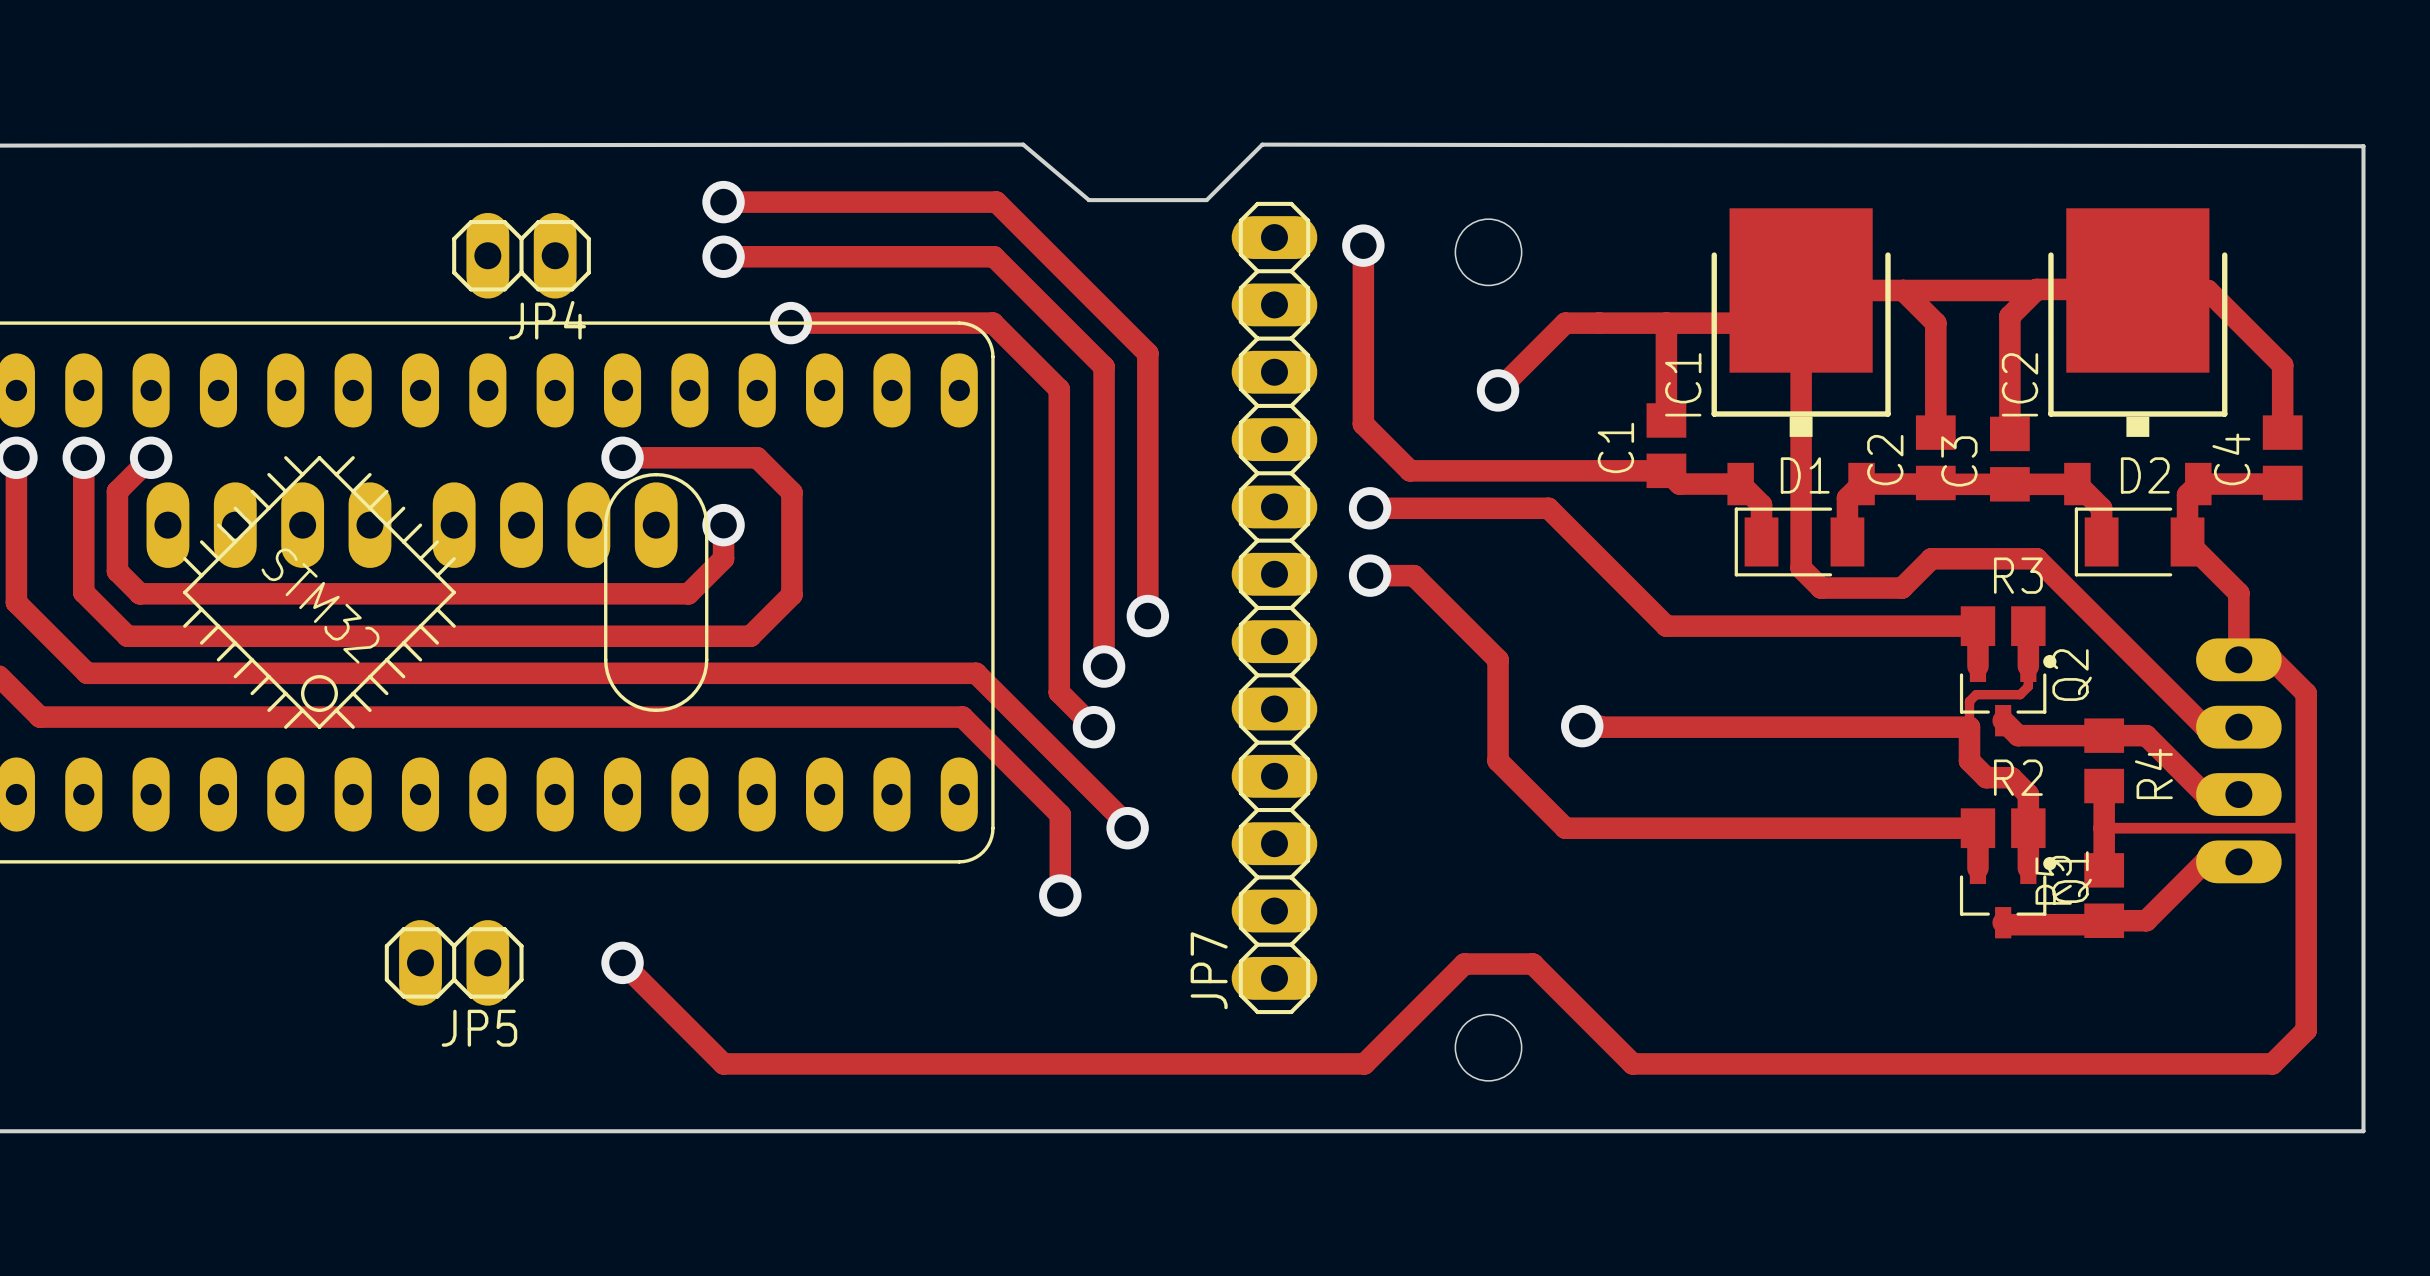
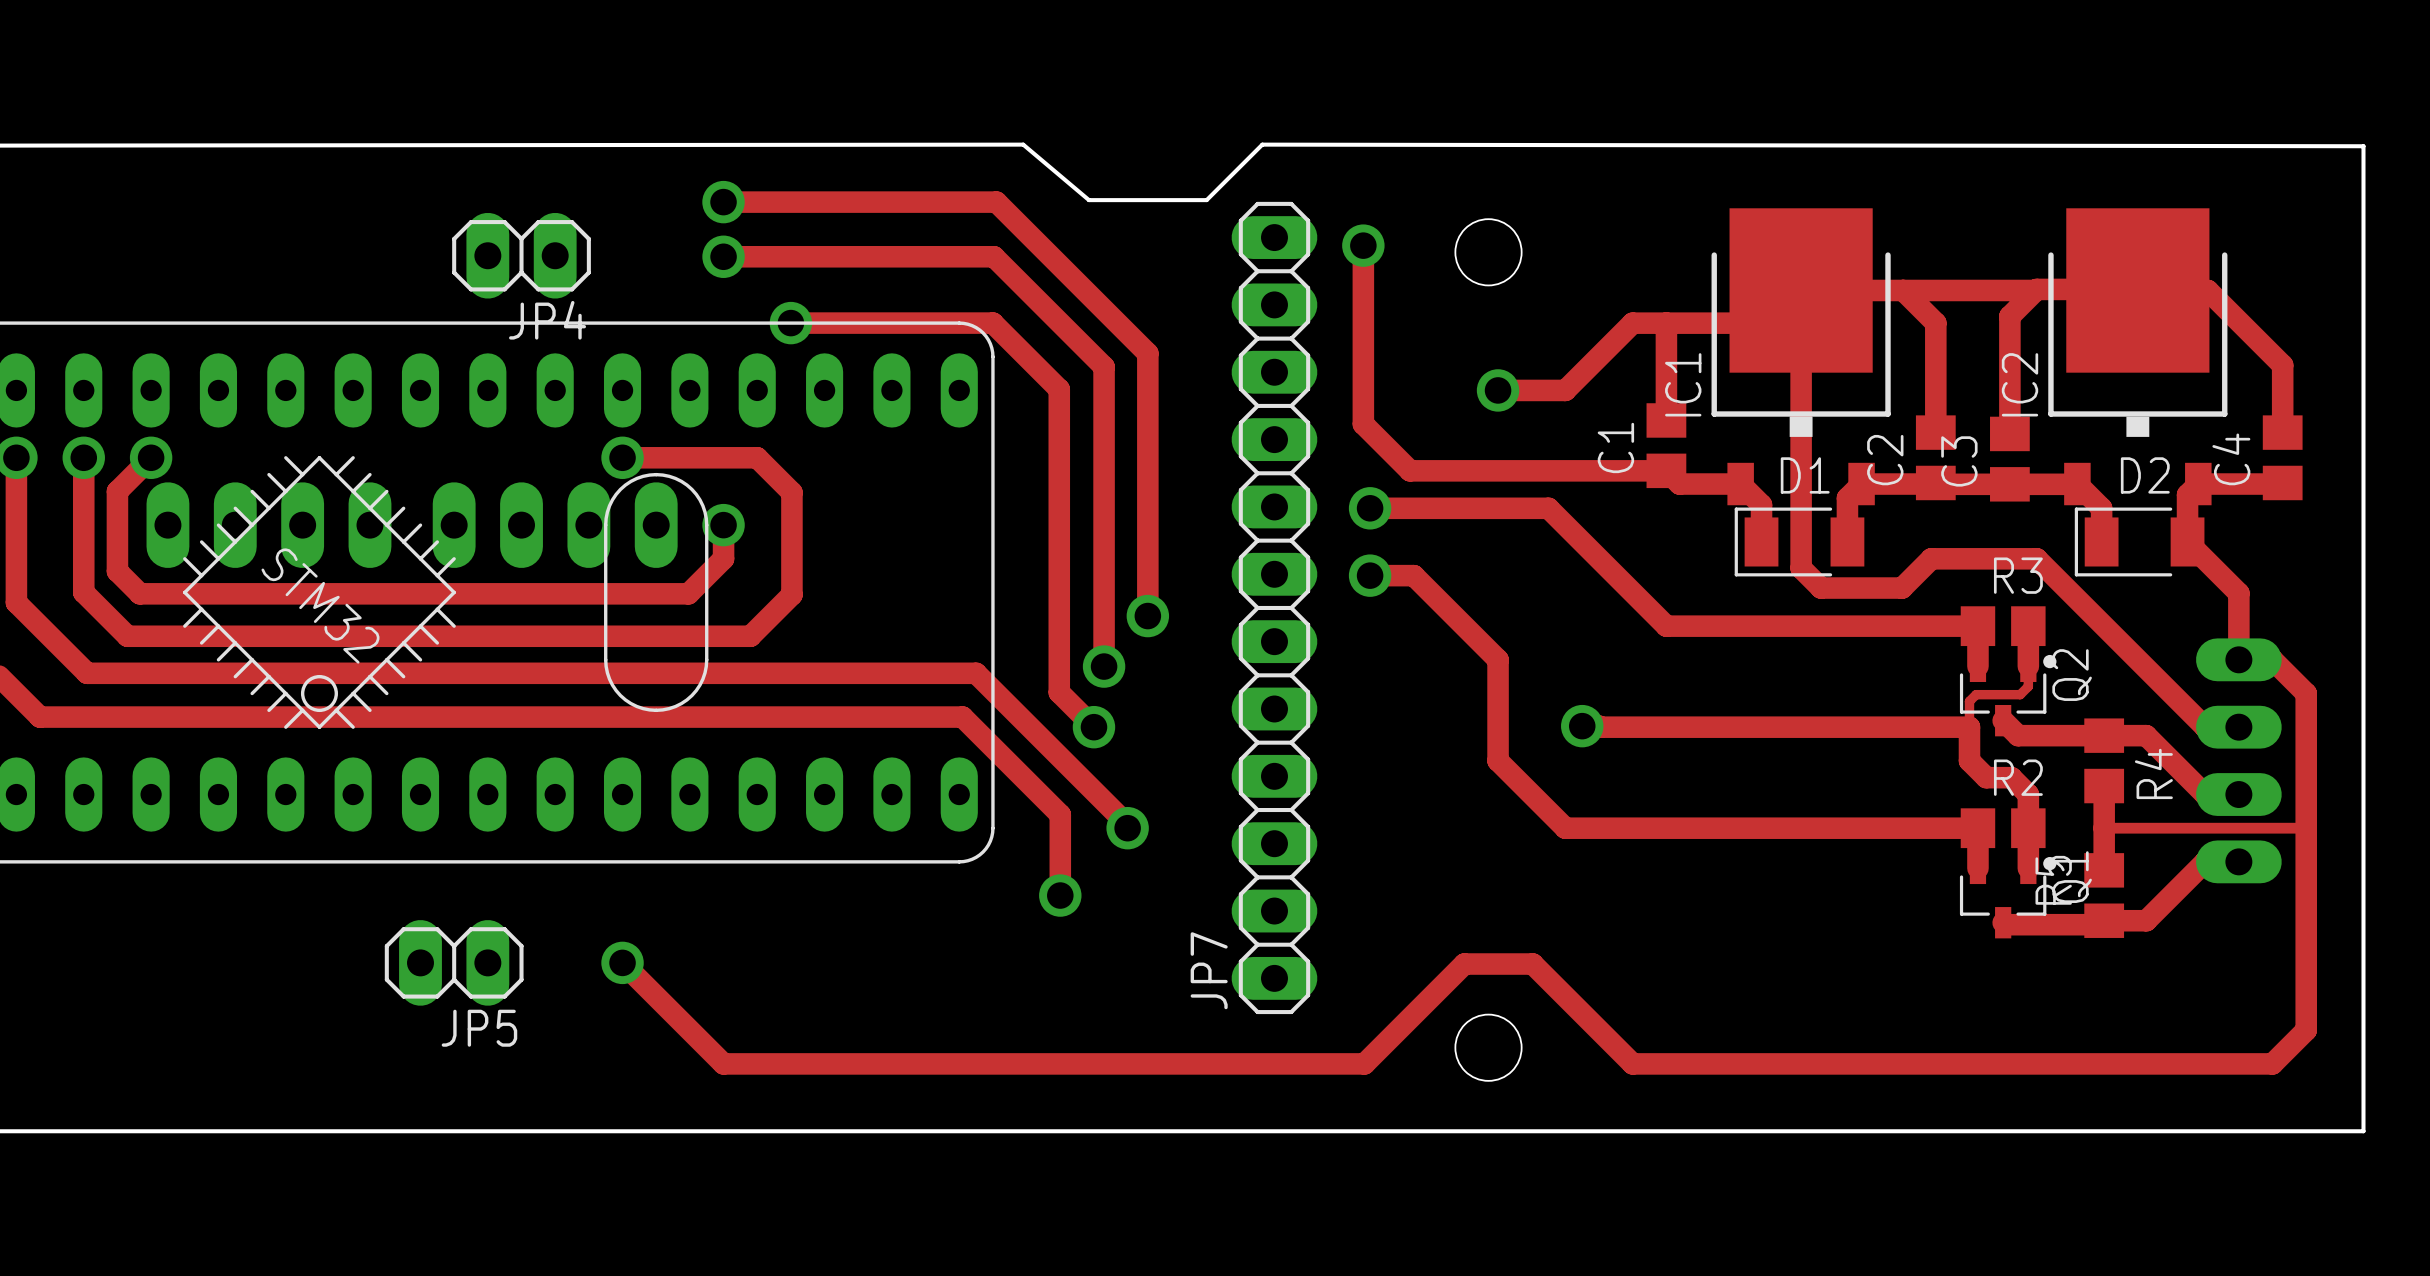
track: (1632, 323) (1565, 323) (1498, 390) -> (1632, 323) (1565, 390) (1498, 390)

